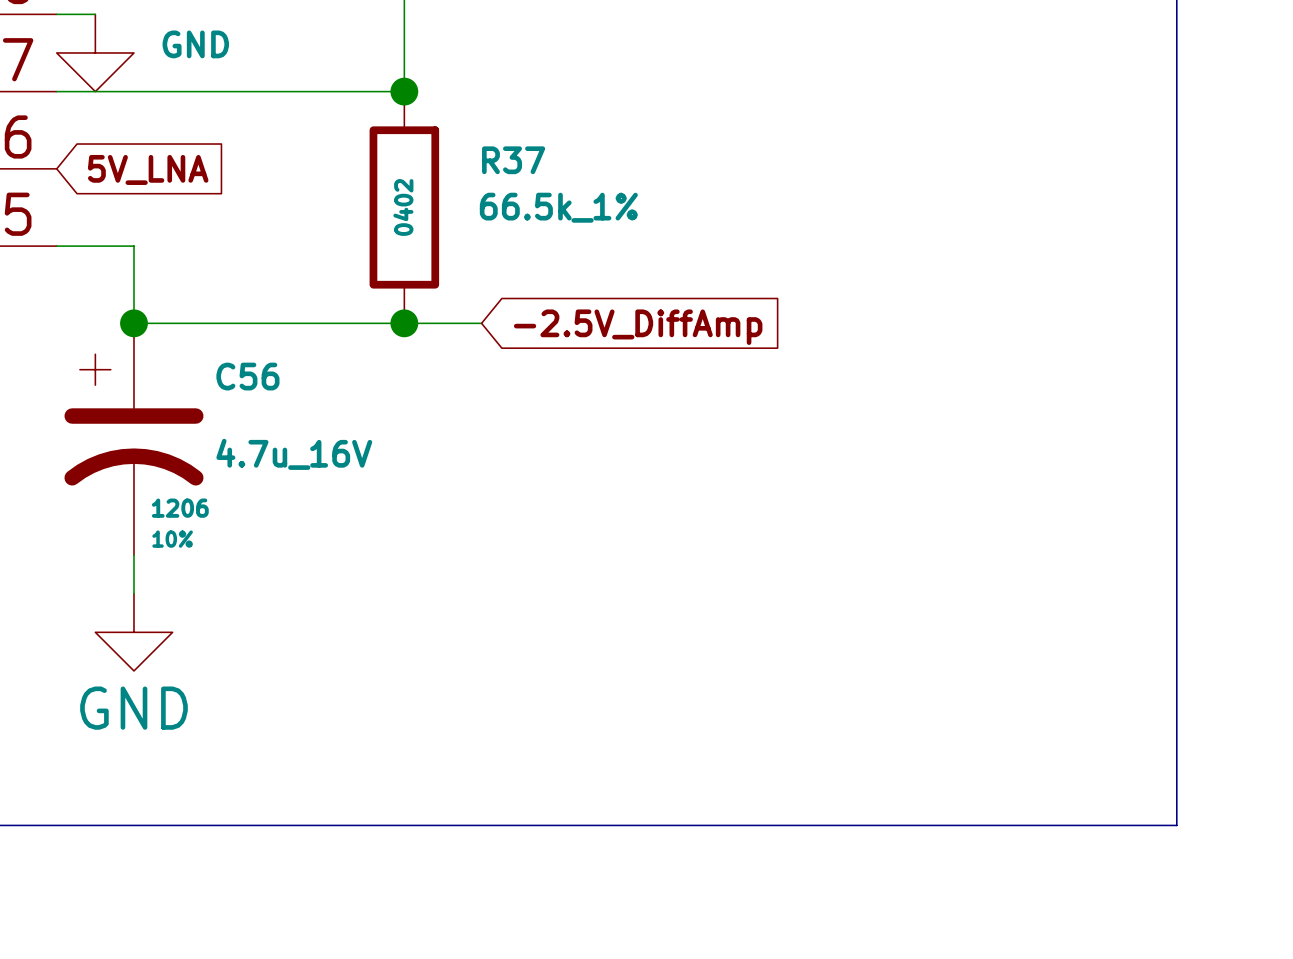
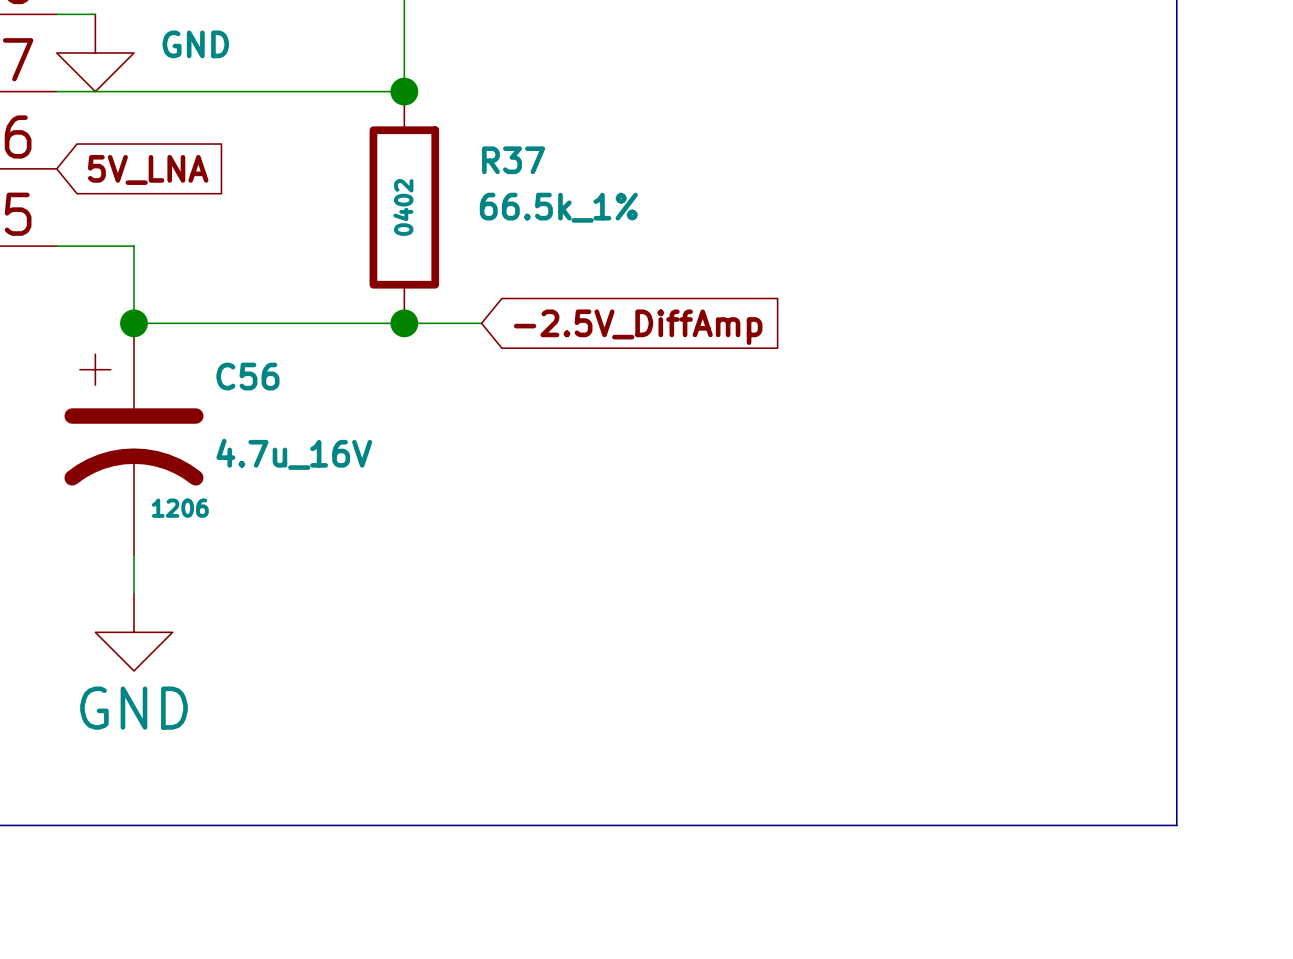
C56 text: 10% (172, 539) -> none

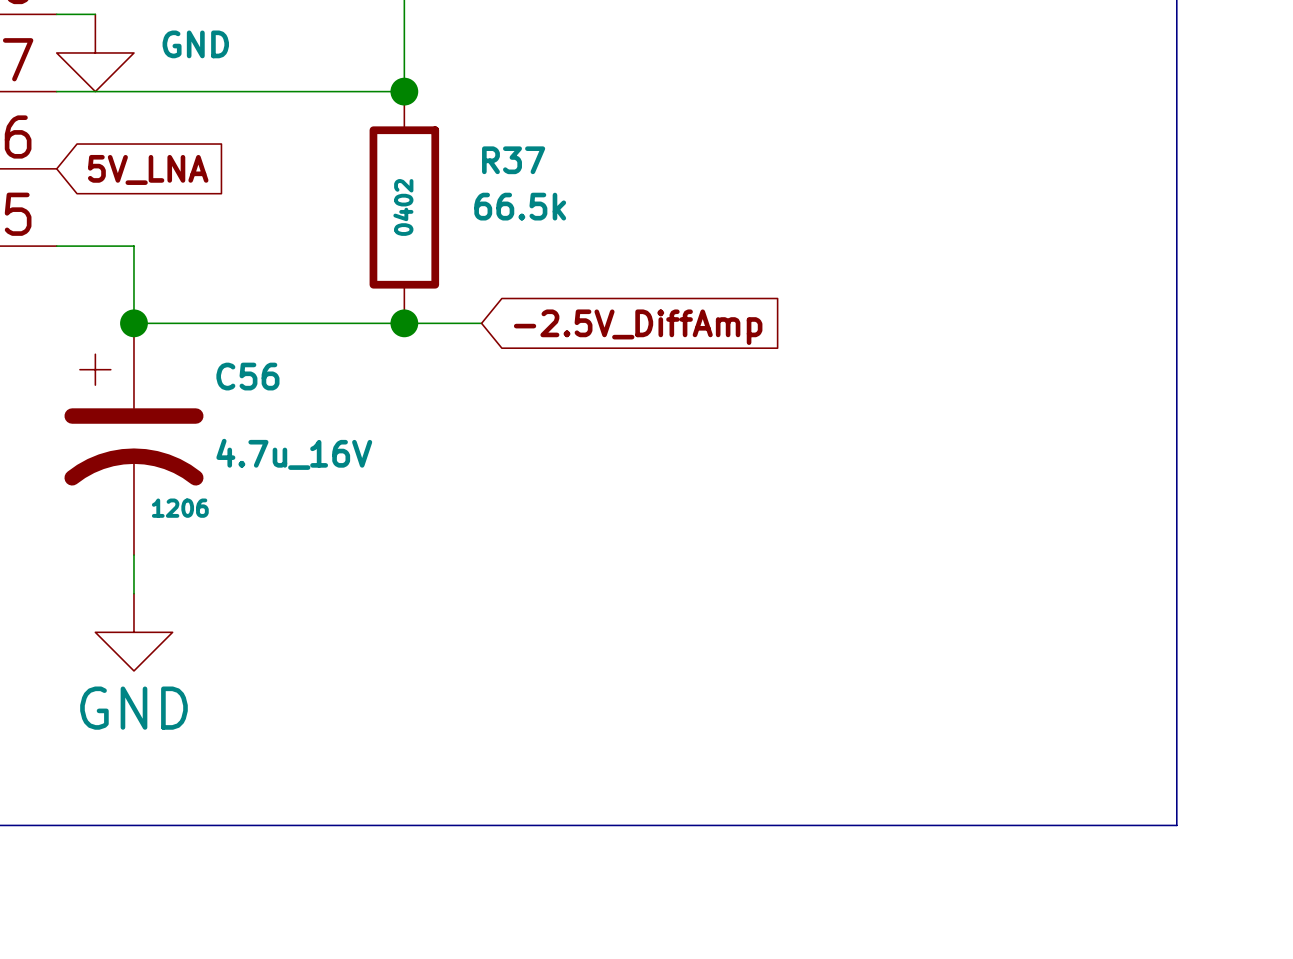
R37 value: 66.5k_1% (558, 207) -> 66.5k (520, 206)

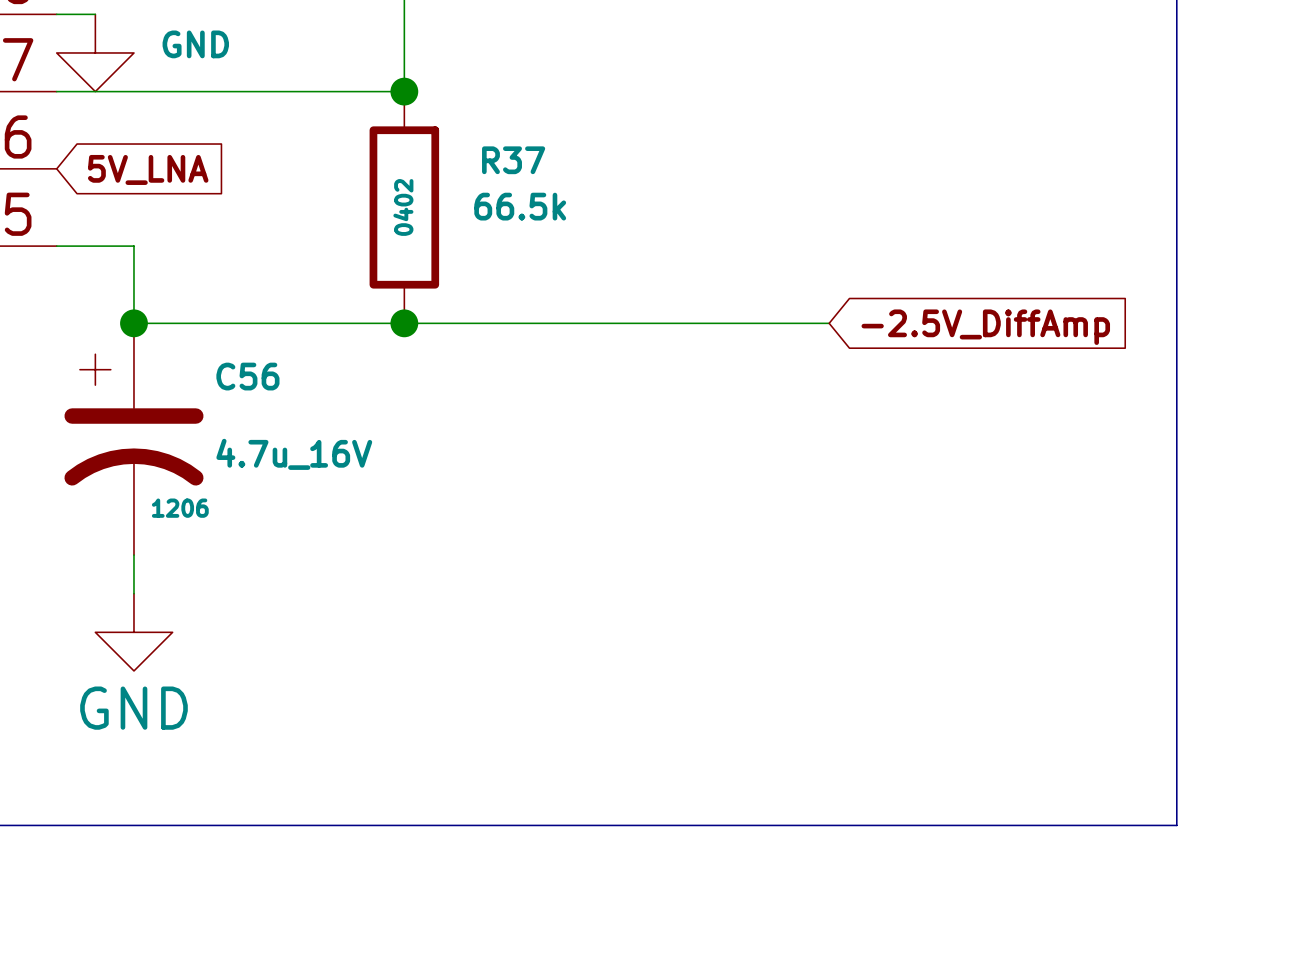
wire: none -> (481, 323) (829, 323)
global label position: -2.5V_DiffAmp (638, 327) -> -2.5V_DiffAmp (985, 327)

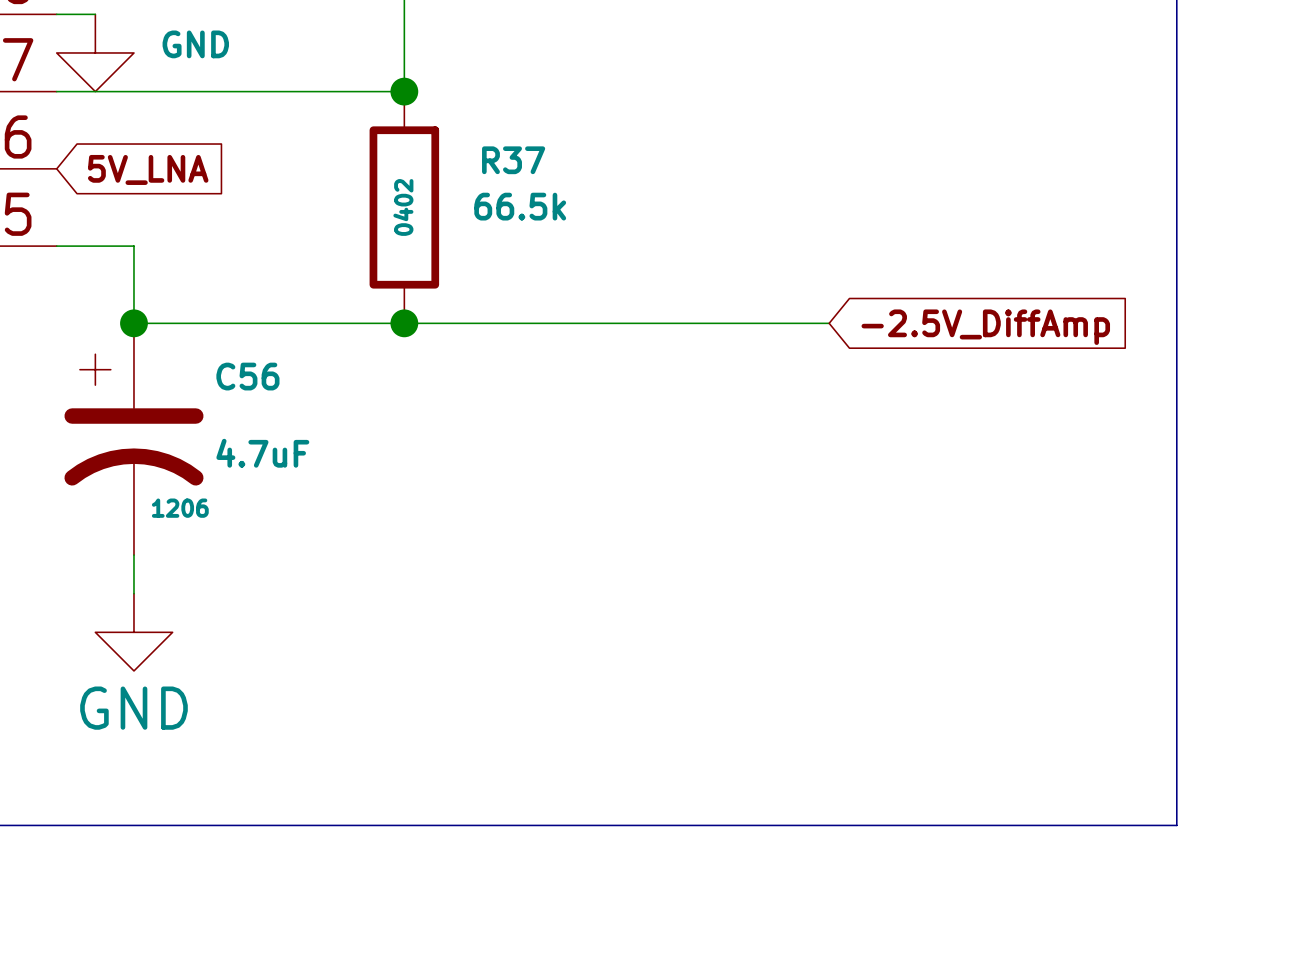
C56 value: 4.7u_16V (294, 454) -> 4.7uF (262, 453)

